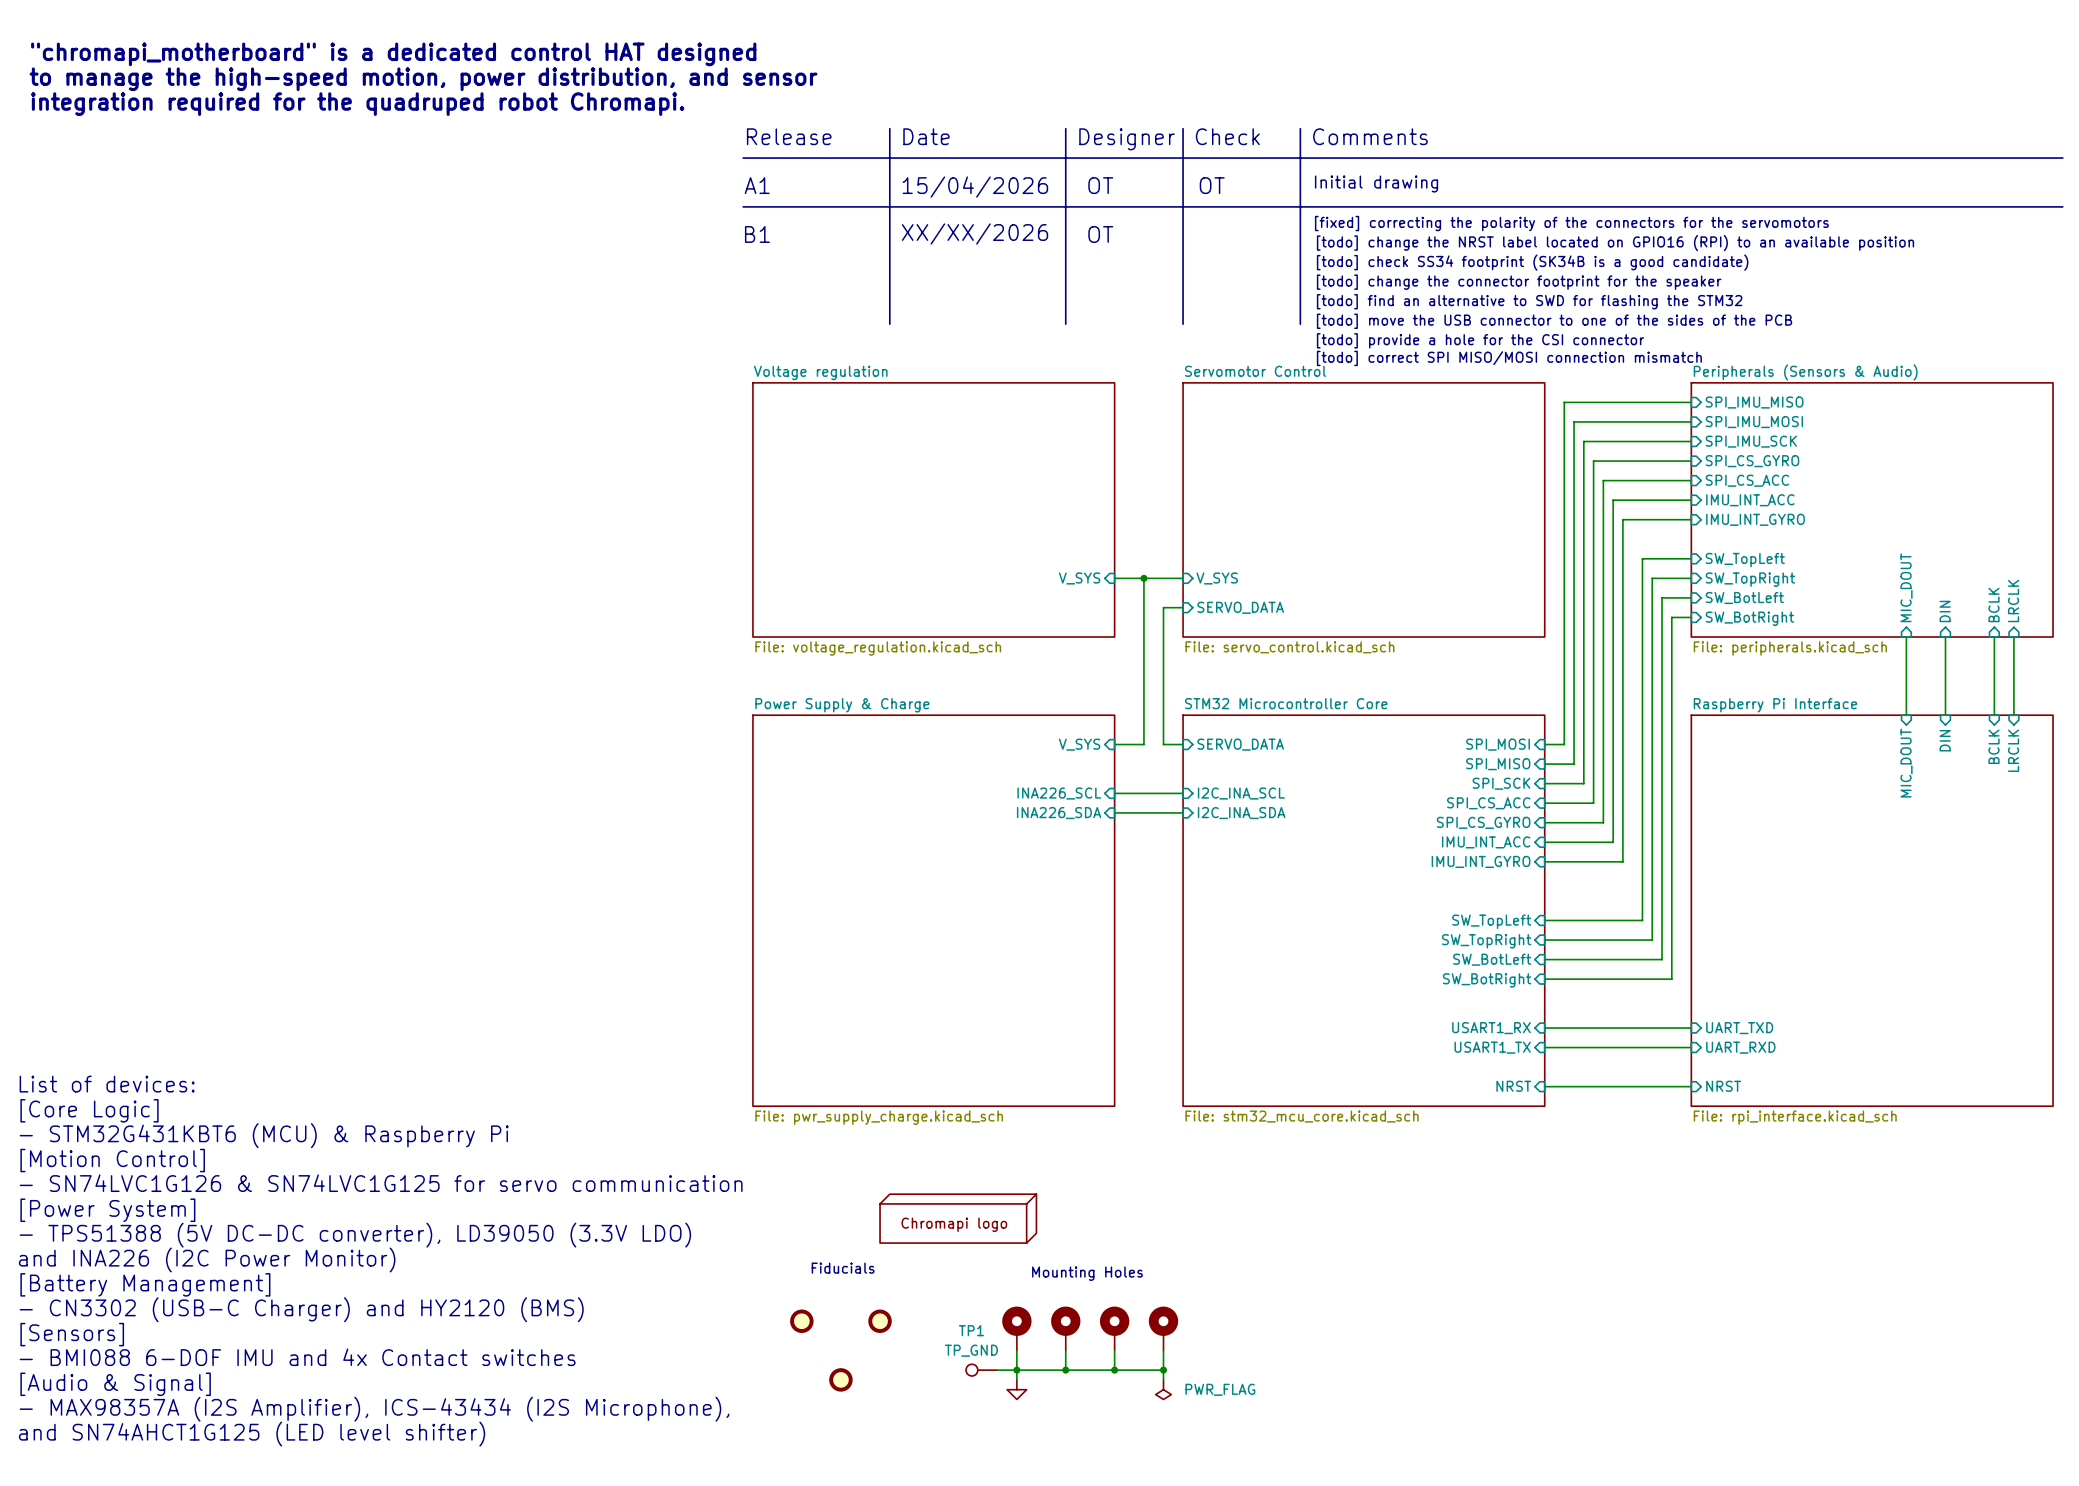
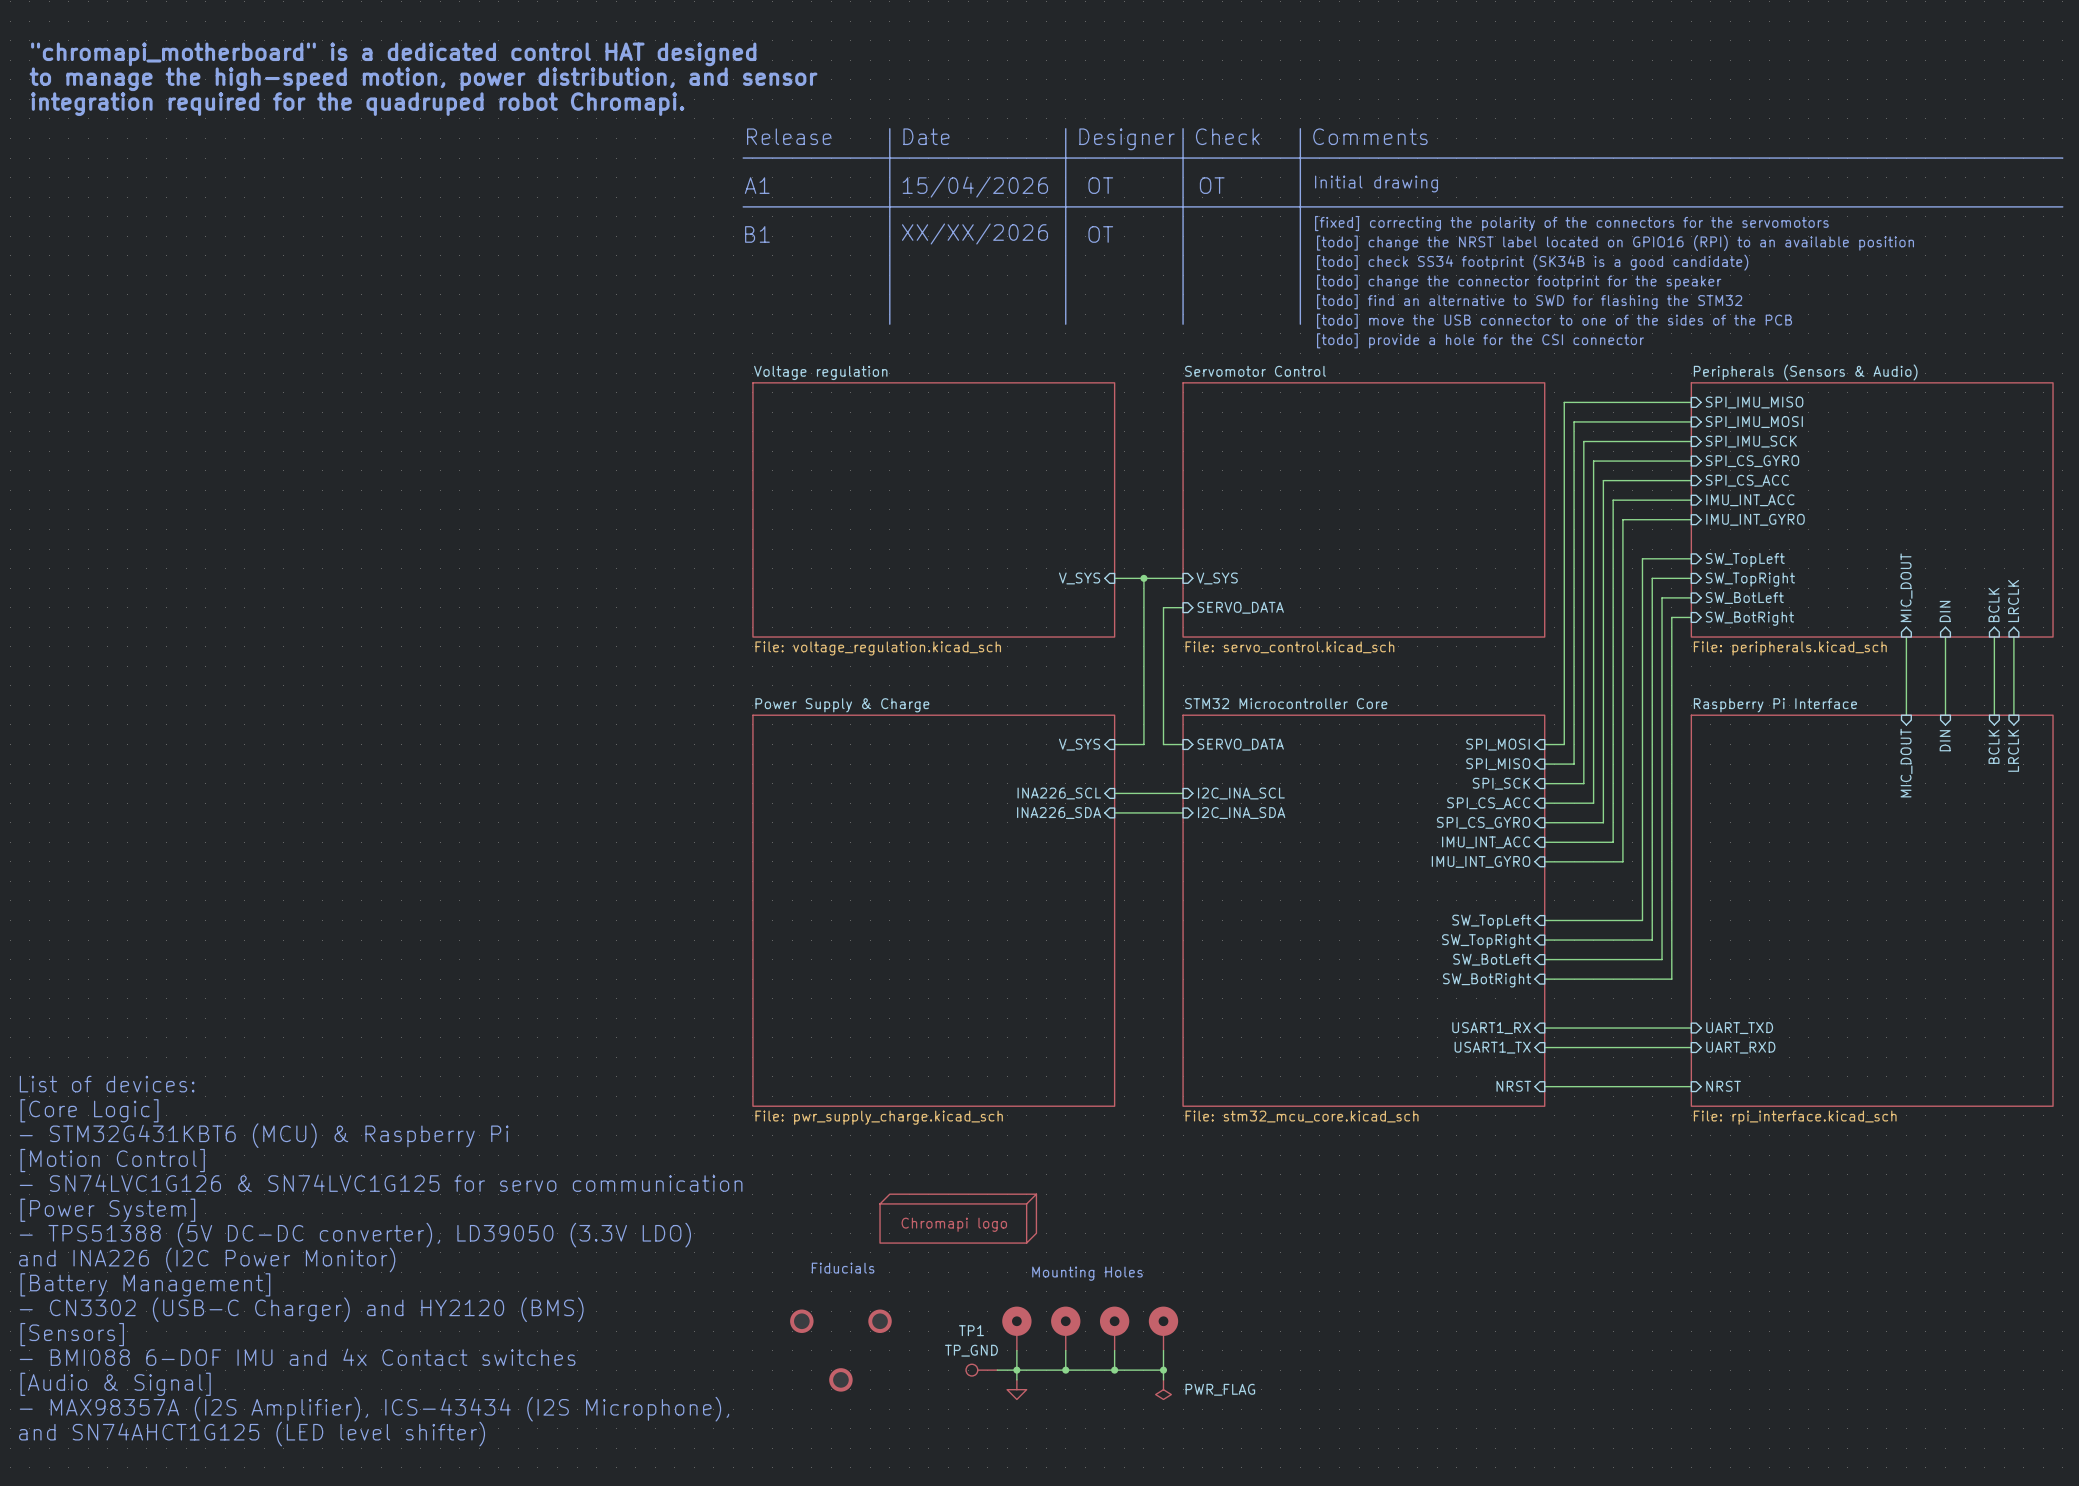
text: [todo] correct SPI MISO/MOSI connection mismatch (1509, 358) -> none

